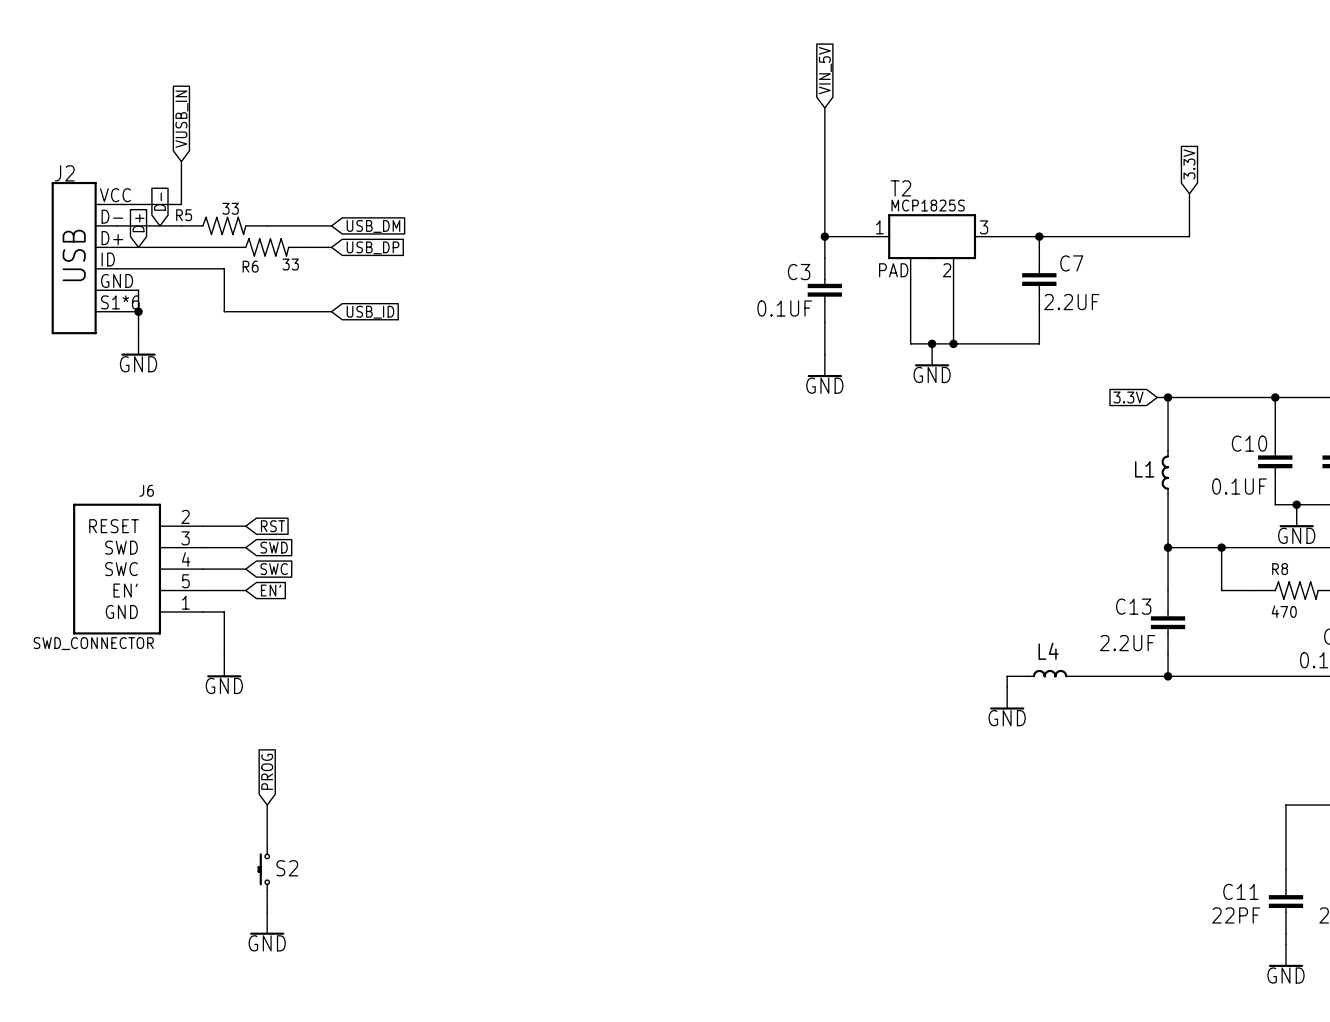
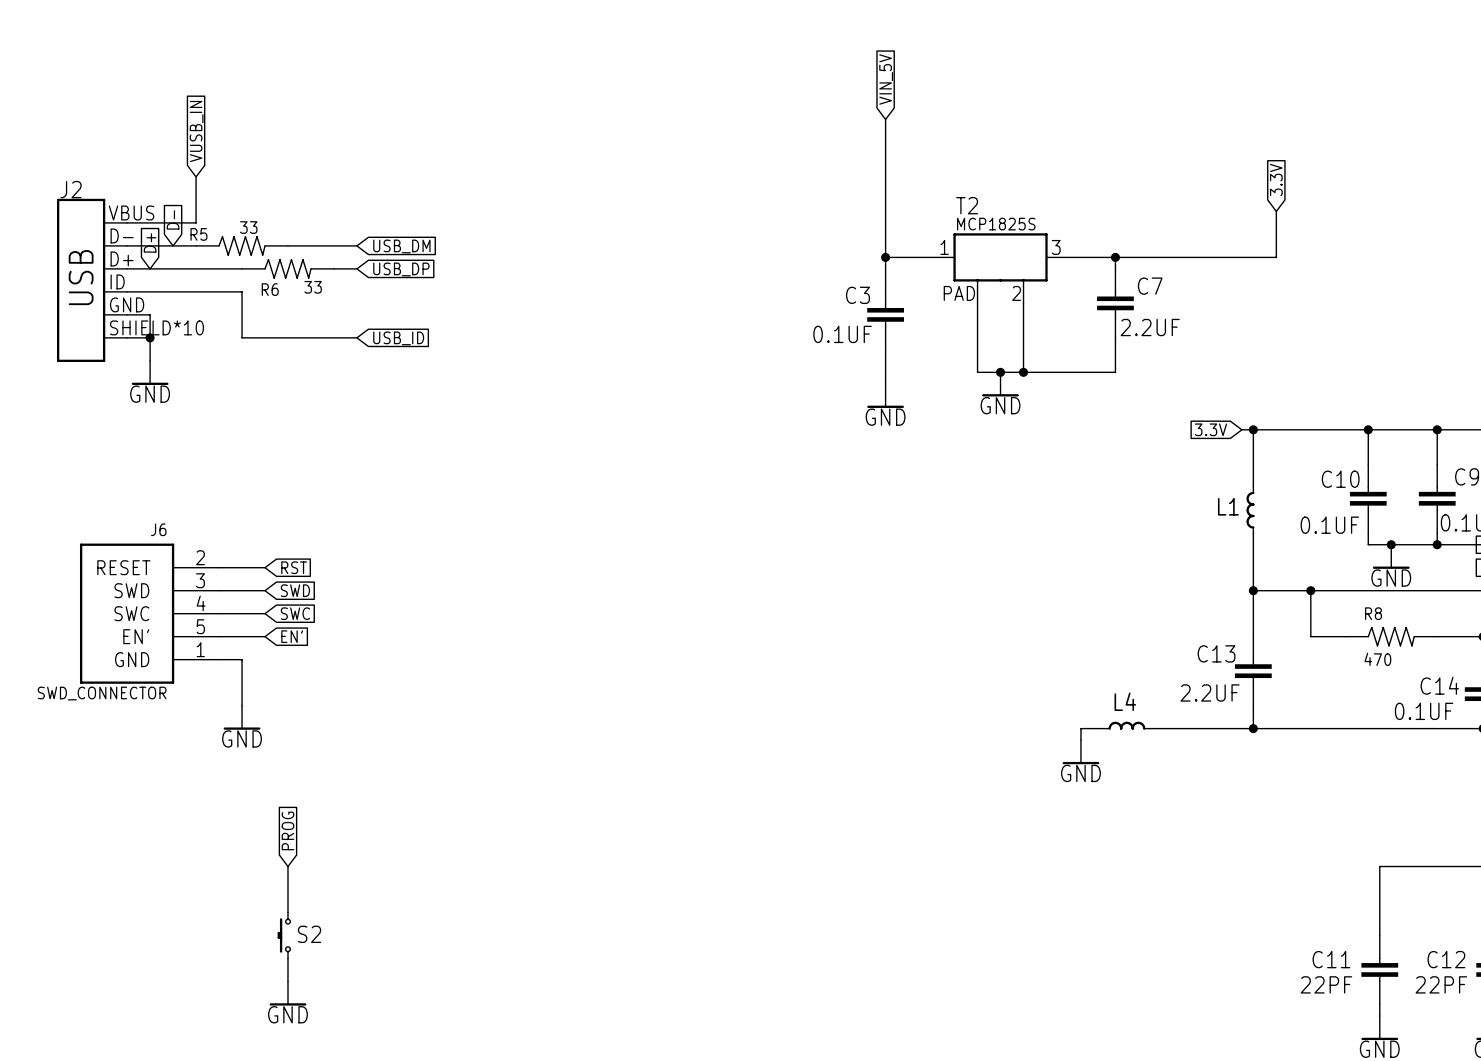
J2 pin number: VCC (115, 195) -> VBUS (131, 212)
J2 pin number: S1*6 (120, 302) -> SHIELD*10 (156, 327)

